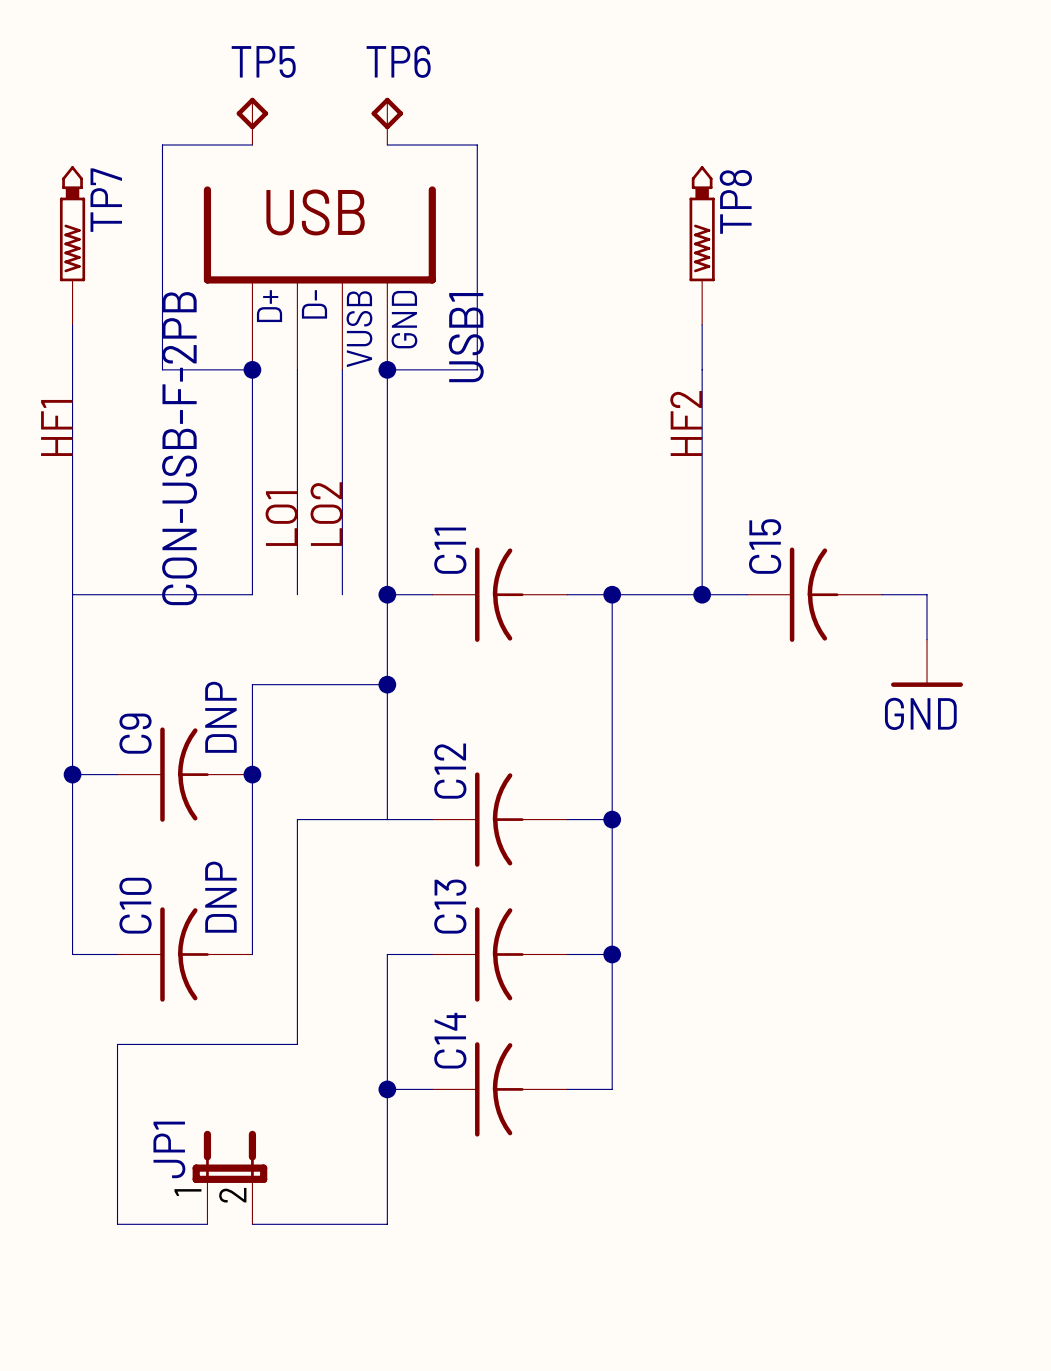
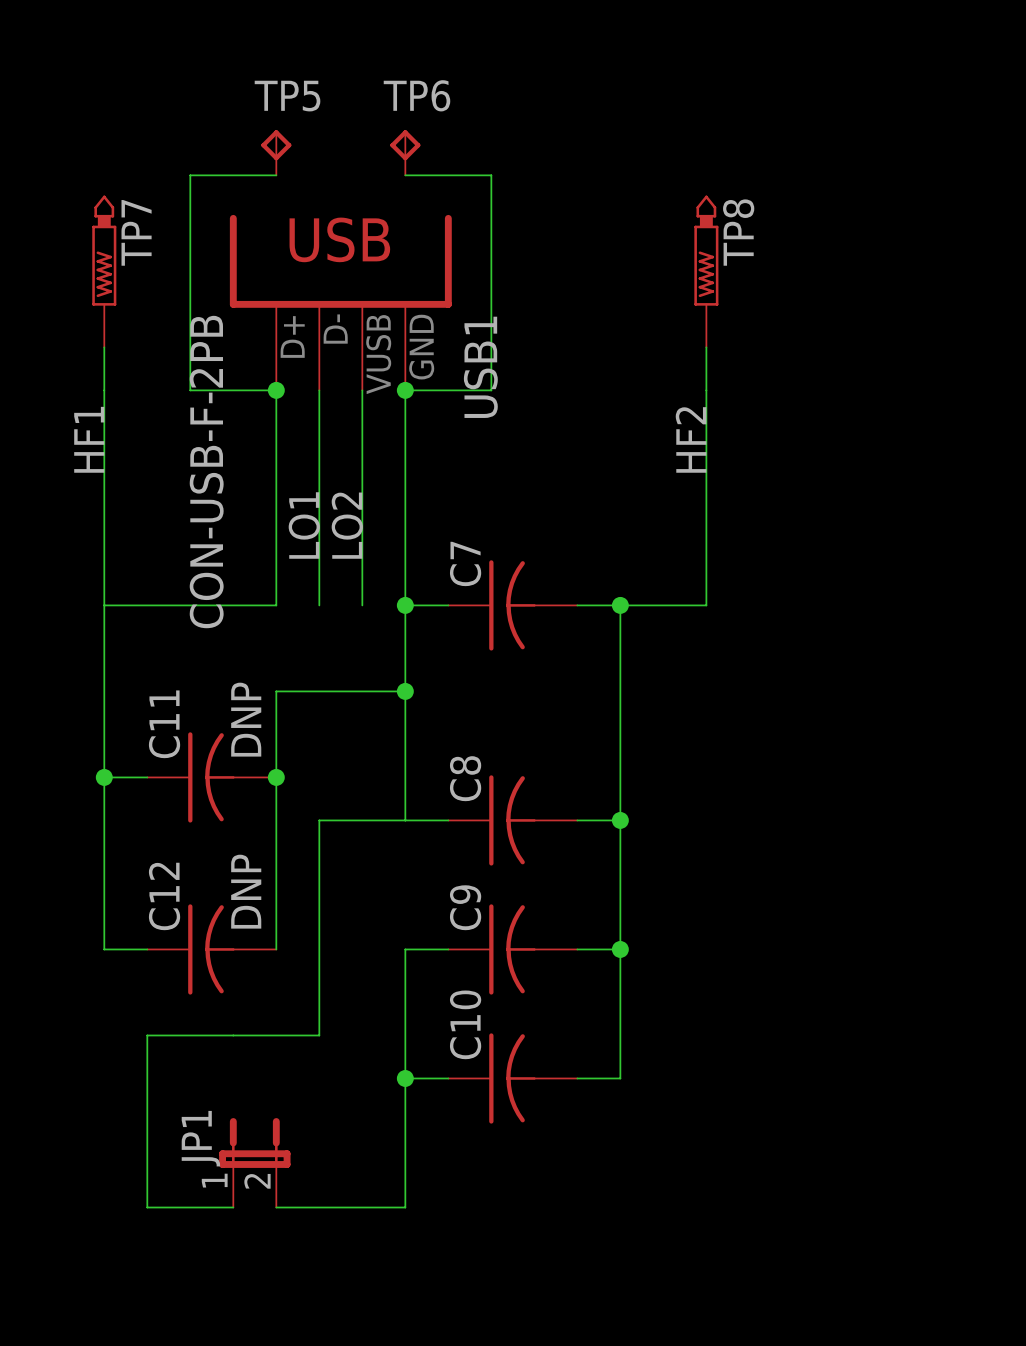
C11 name: C11 (450, 550) -> C7 (465, 563)
wire: (702, 594) (747, 594) -> none
junction: (702, 594) -> none
C15: (814, 594) -> none
wire: (882, 594) (927, 594) (927, 639) -> none
power symbol: GND (927, 663) -> none
C9 name: C9 (135, 733) -> C11 (164, 724)
C12 name: C12 (450, 771) -> C8 (465, 778)
C10 name: C10 (135, 905) -> C12 (164, 896)
C13 name: C13 (450, 906) -> C9 (465, 907)
C14 name: C14 (450, 1040) -> C10 (465, 1024)

